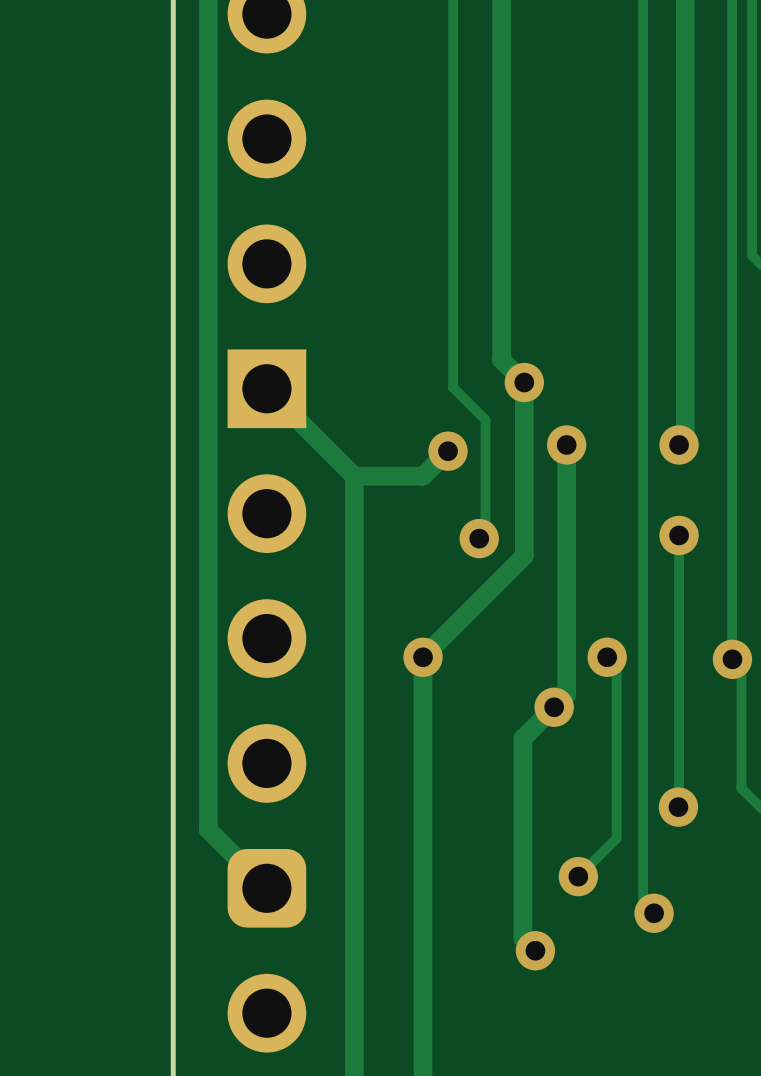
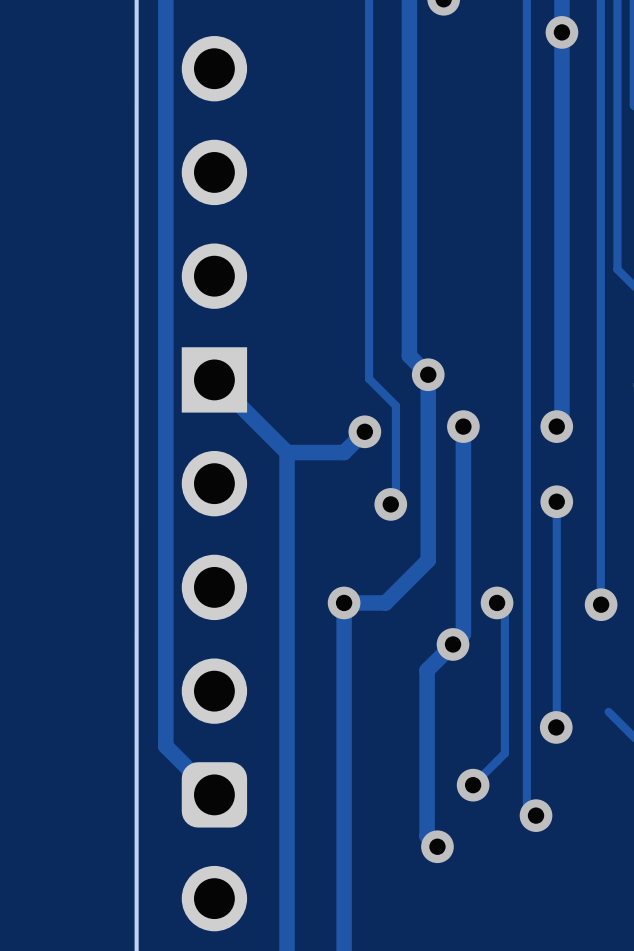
track: (524, 555) (423, 657) -> (428, 518) (428, 560) (385, 602) (344, 602)
track: (732, 659) (741, 668) (741, 788) -> none

